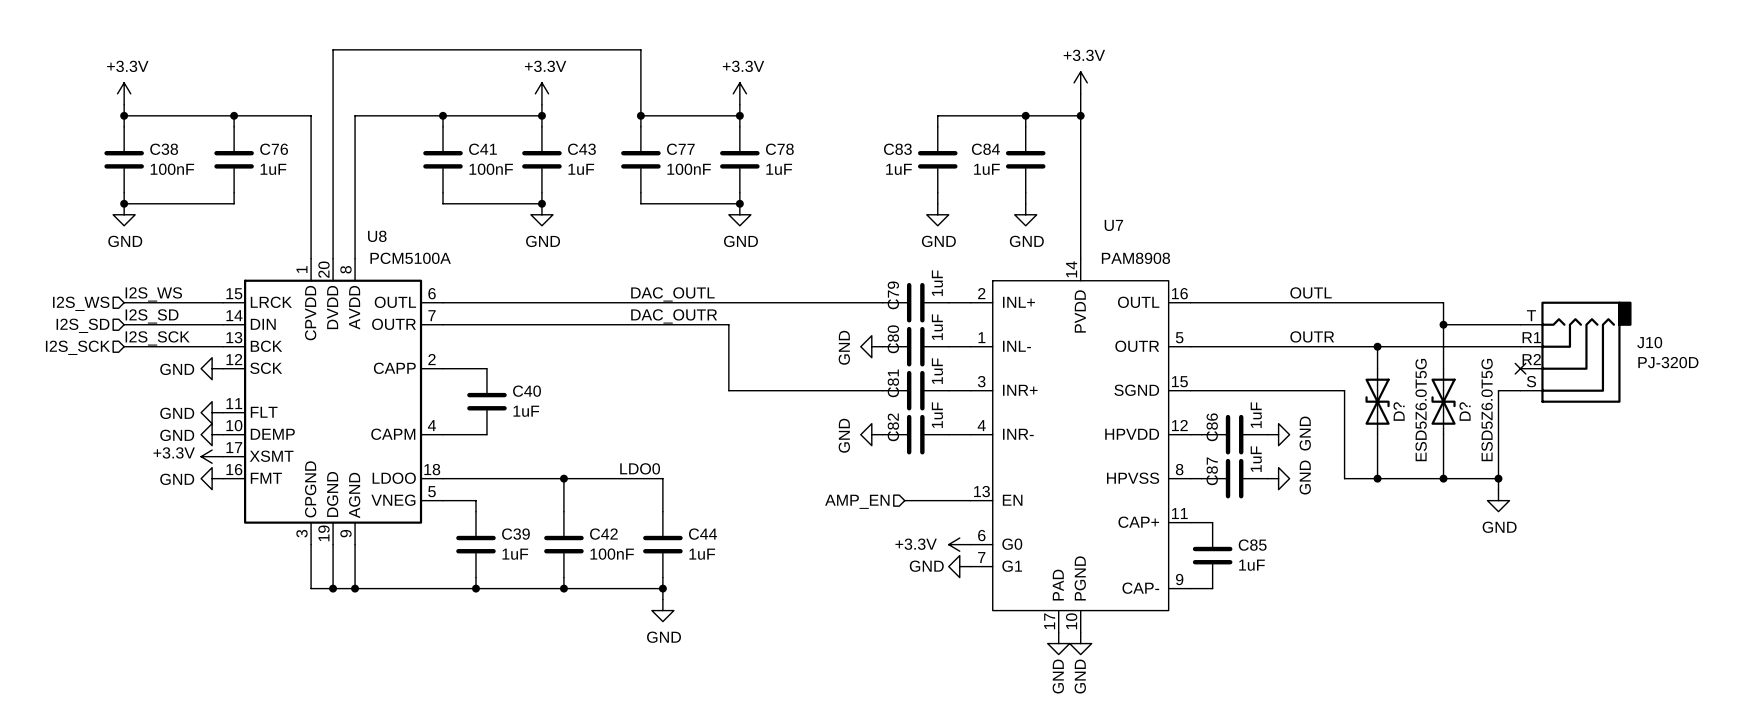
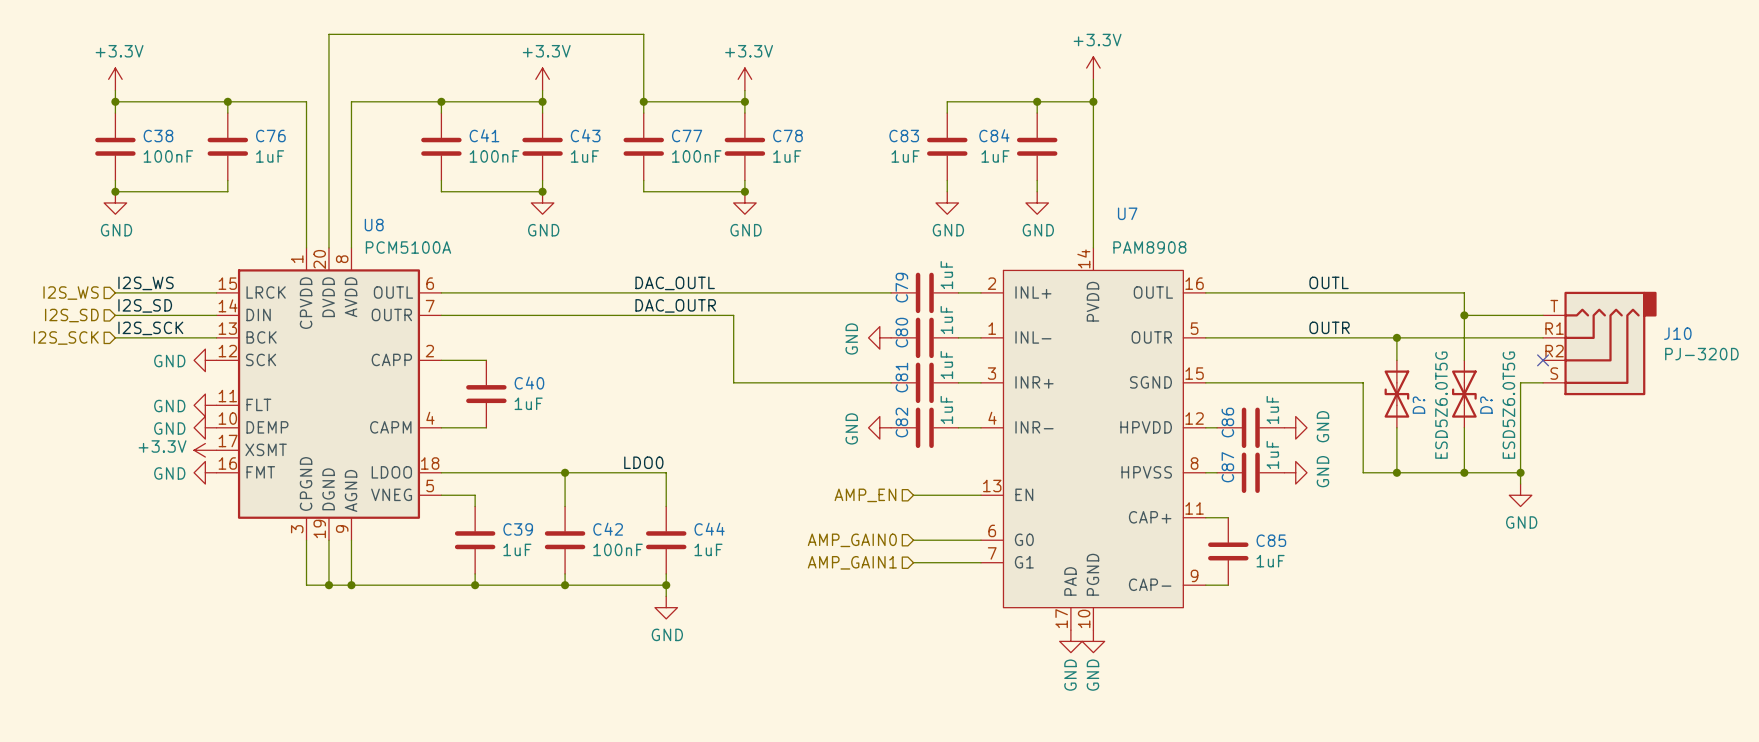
wire: none -> (913, 540) (980, 540)
power symbol: +3.3V (959, 544) -> none
hierarchical label: none -> AMP_GAIN0 (852, 540)
wire: none -> (913, 562) (980, 562)
power symbol: GND (959, 566) -> none
hierarchical label: none -> AMP_GAIN1 (852, 562)

